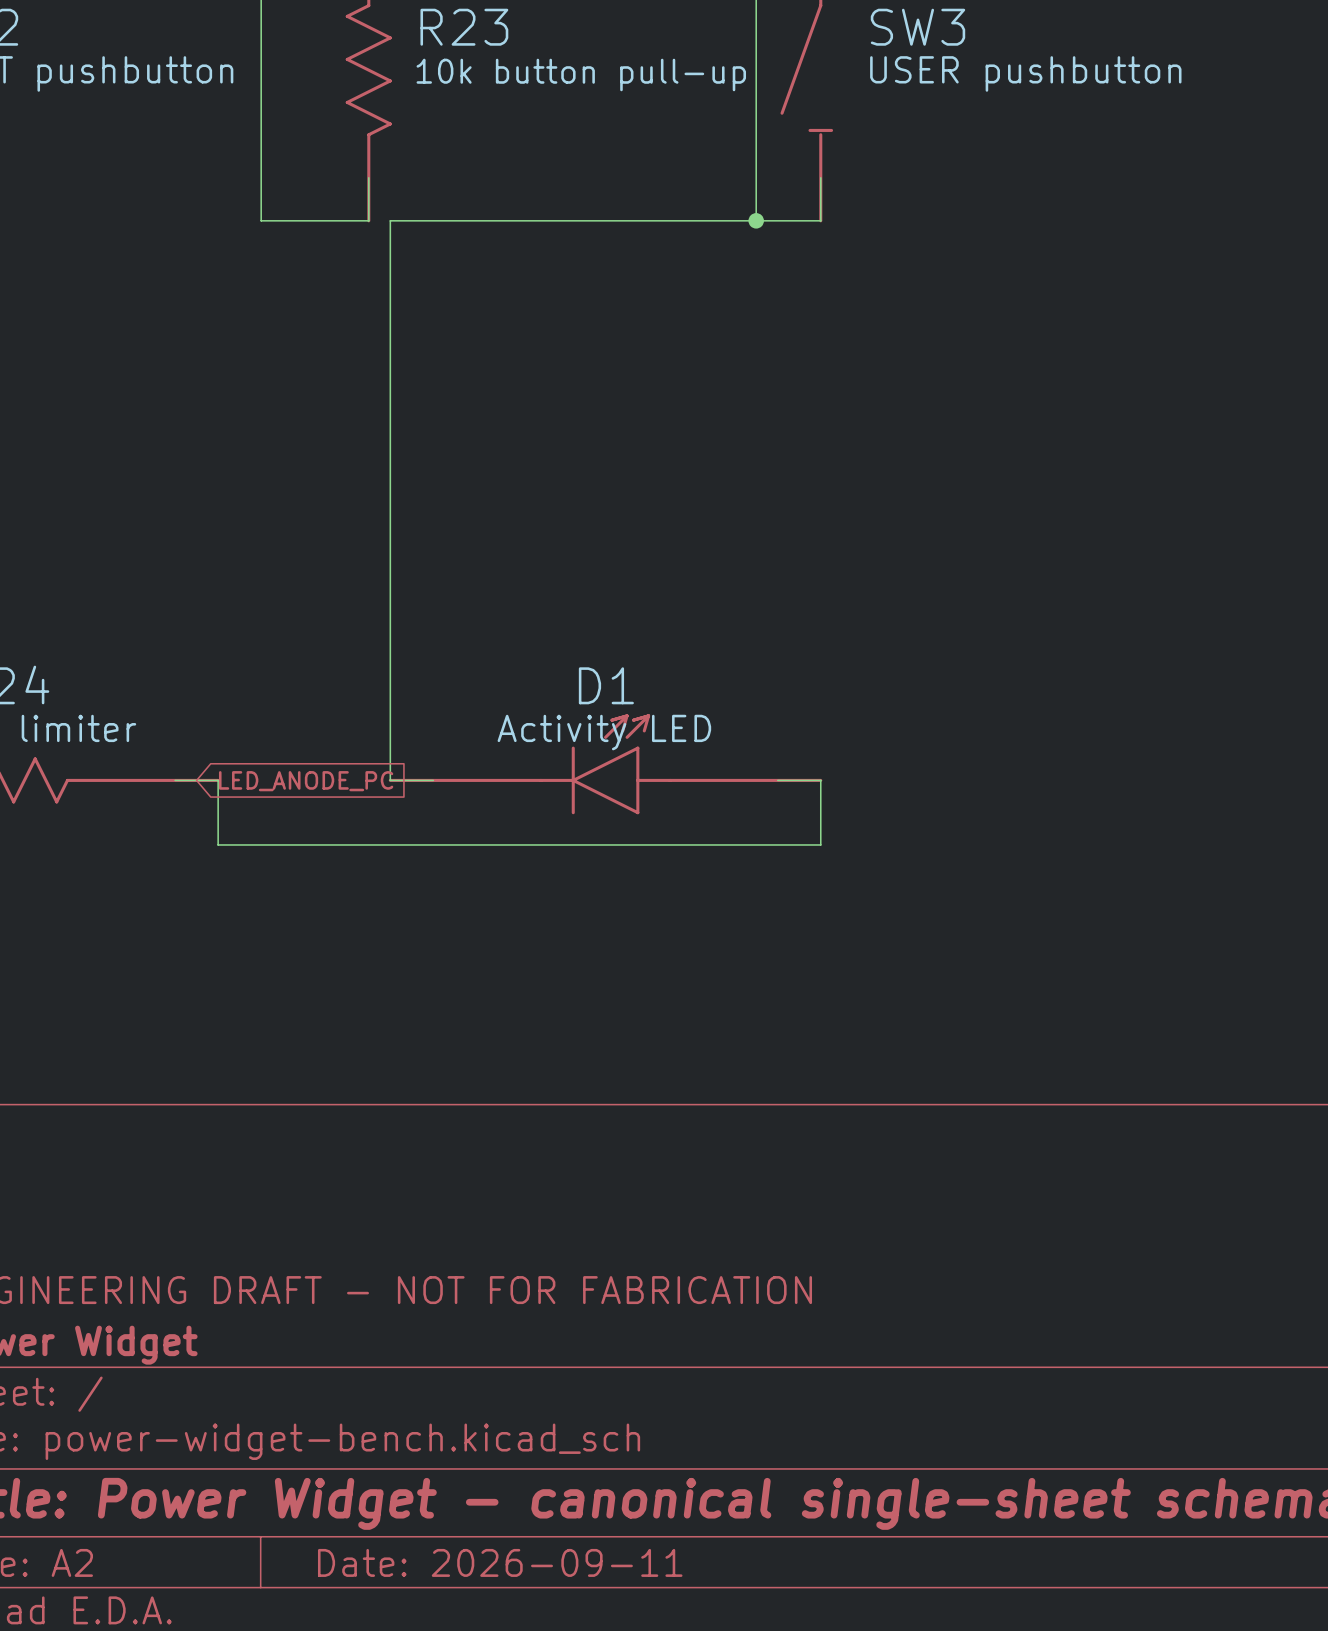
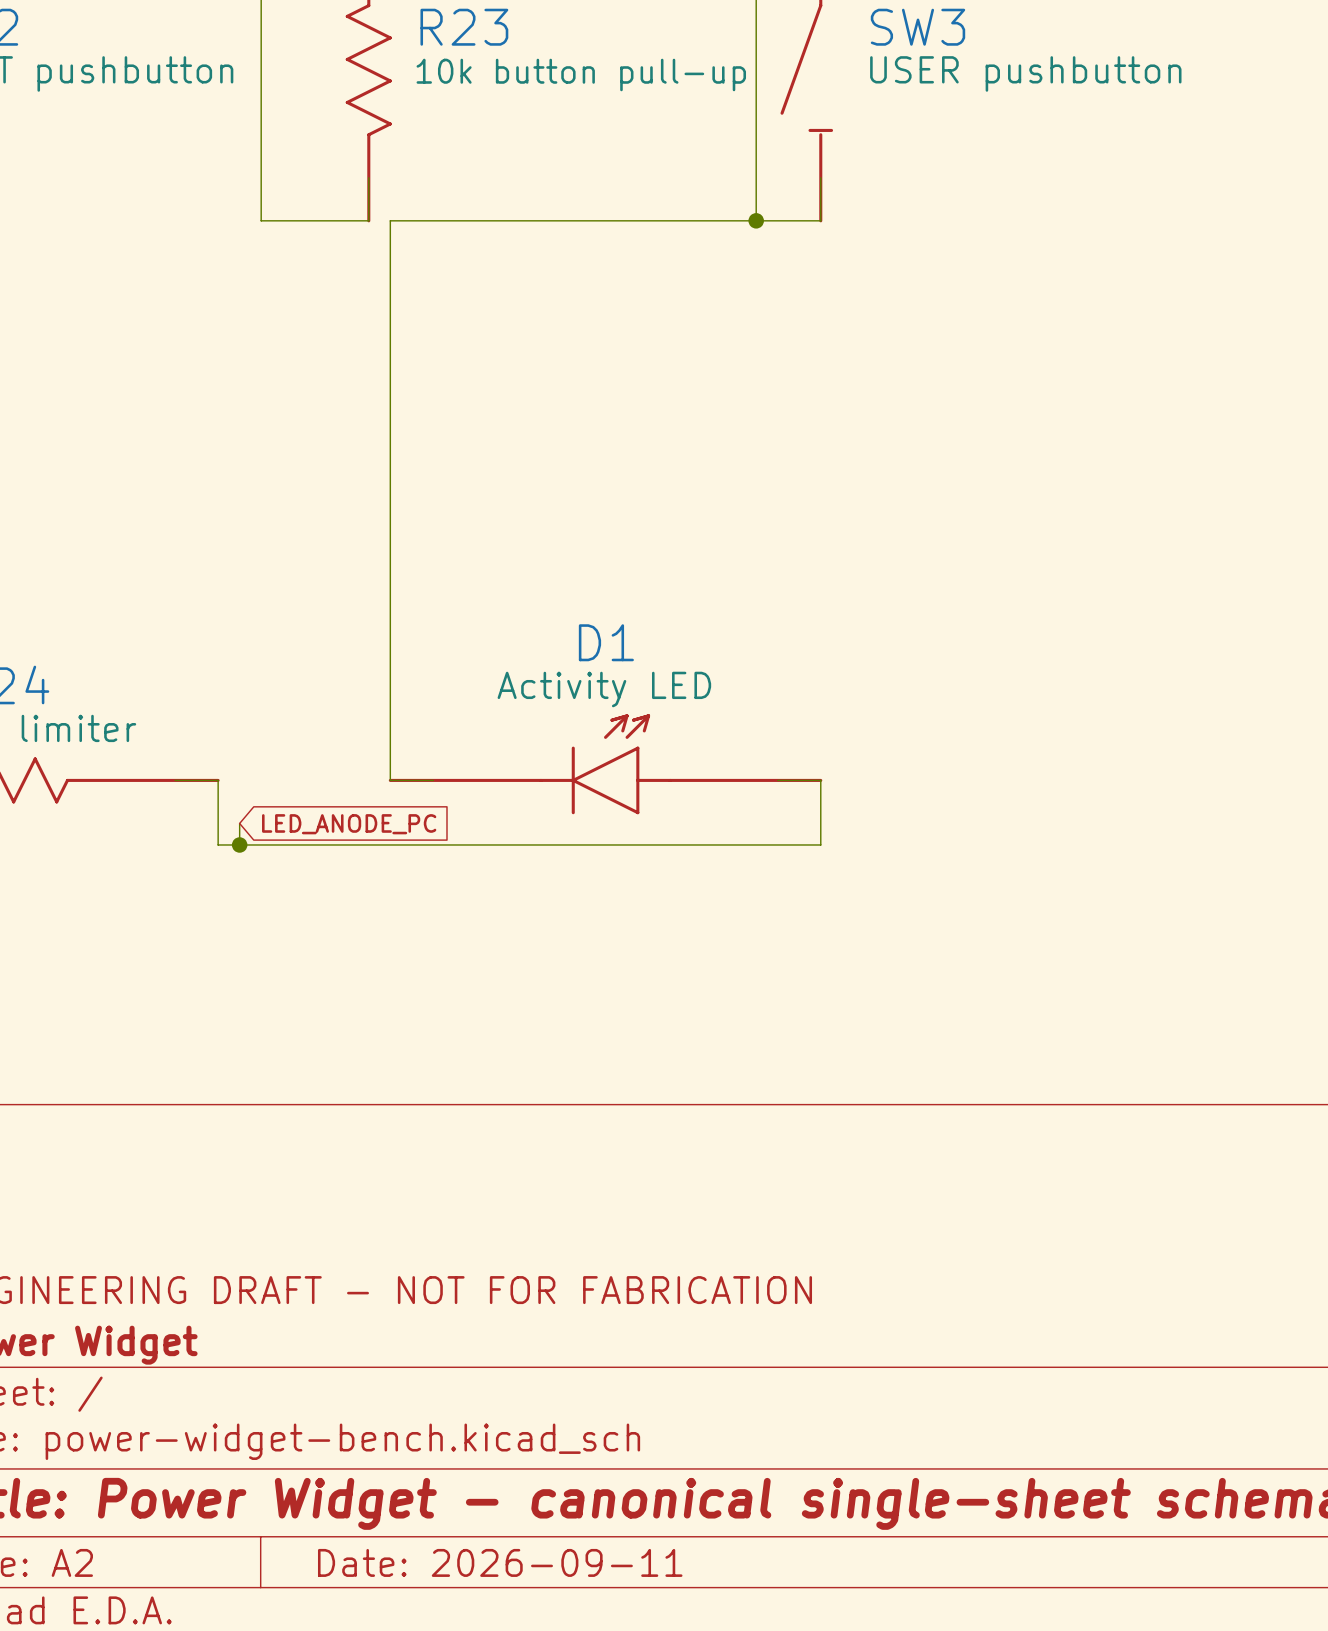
D1 name position: D1 (606, 685) -> D1 (606, 642)
D1 value position: Activity LED (604, 732) -> Activity LED (604, 689)
global label position: LED_ANODE_PC (306, 781) -> LED_ANODE_PC (349, 824)
wire: none -> (239, 823) (239, 844)
junction: none -> (239, 844)

